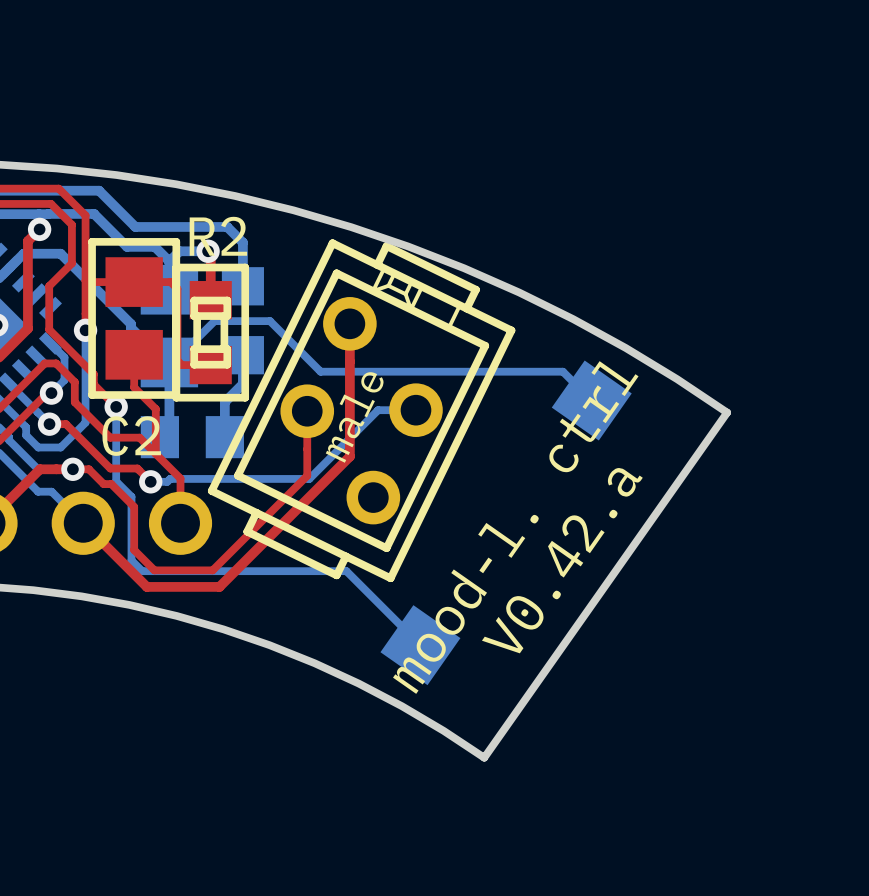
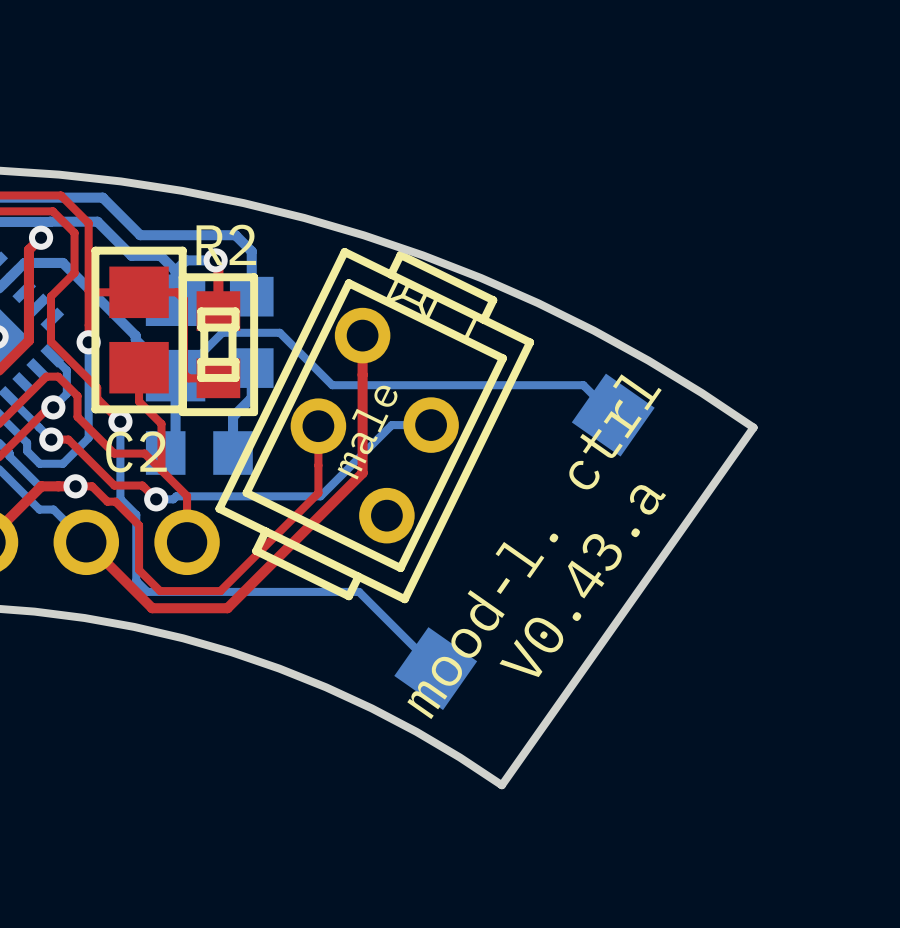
text: V0.42.a (562, 560) -> V0.43.a (582, 580)

